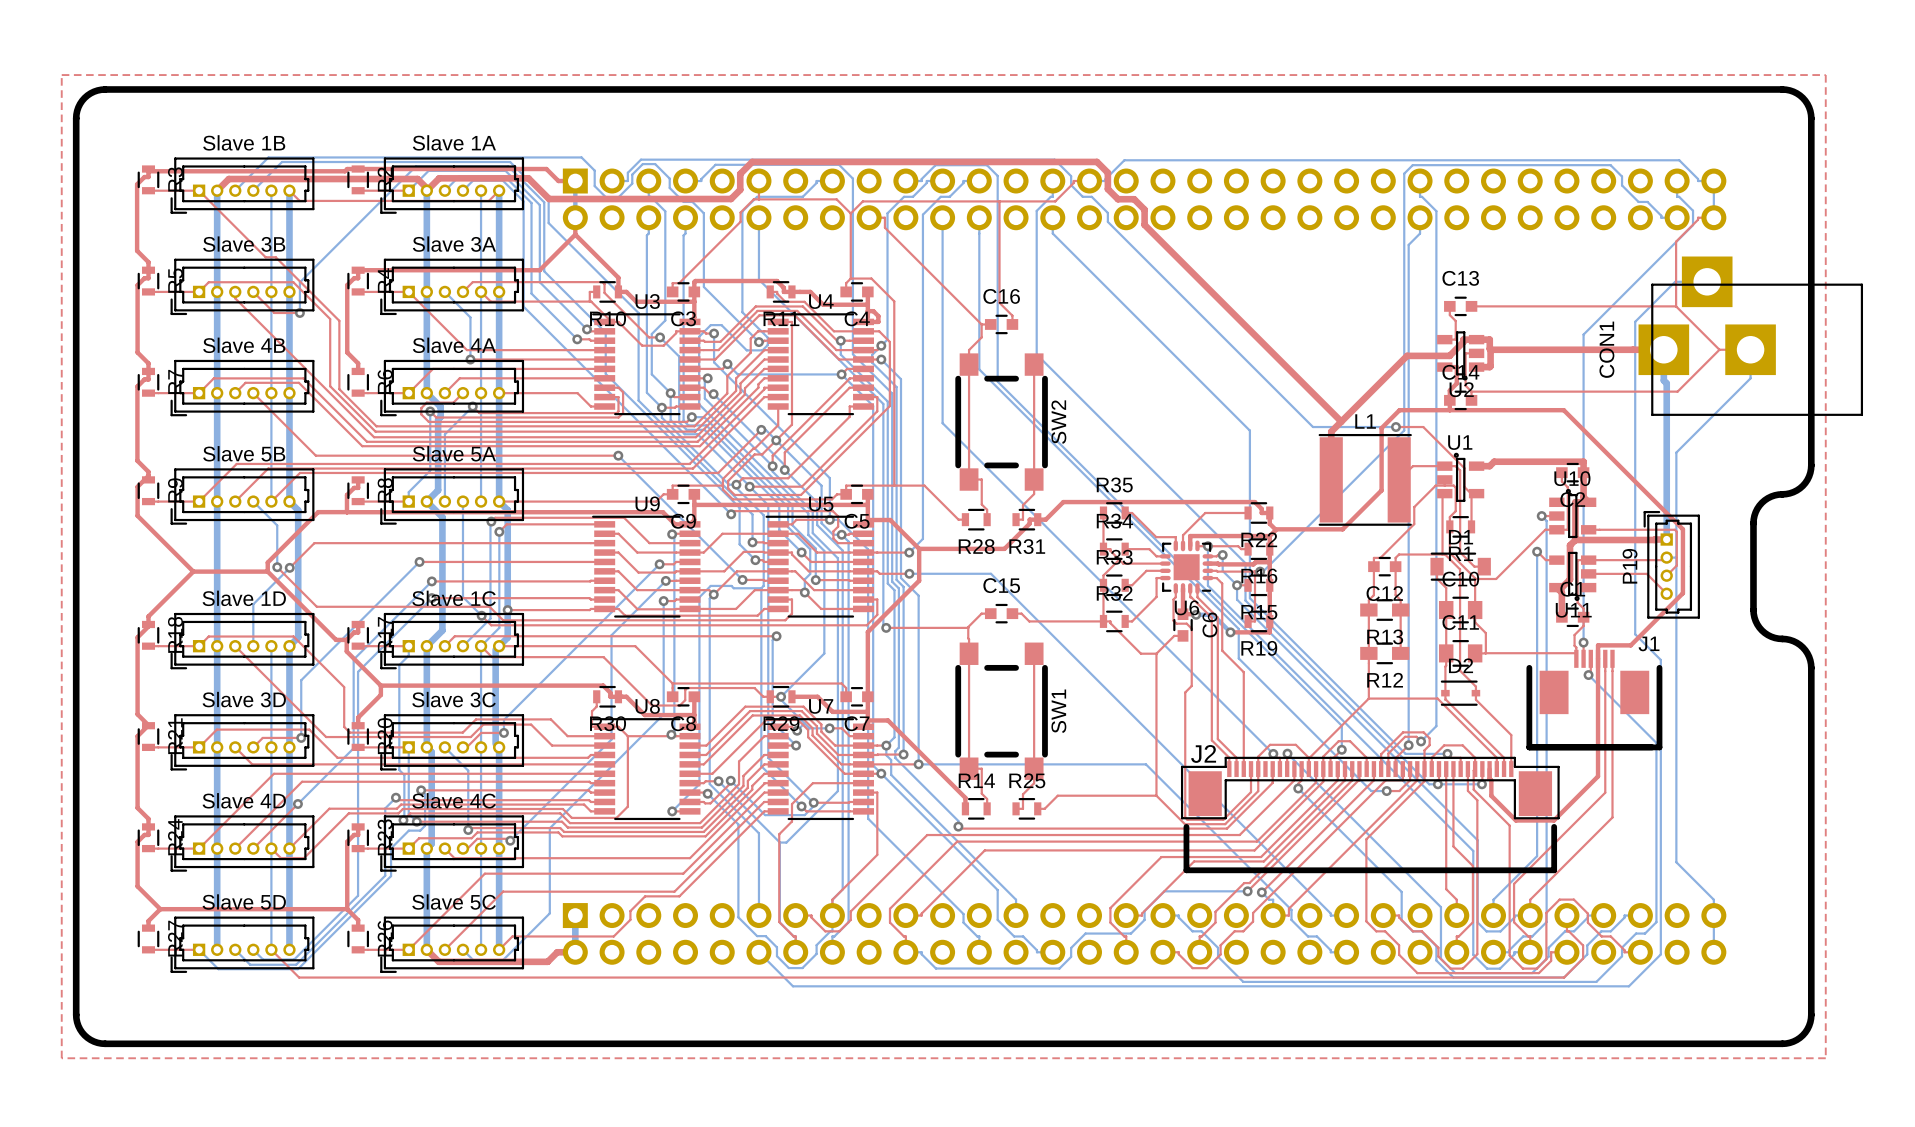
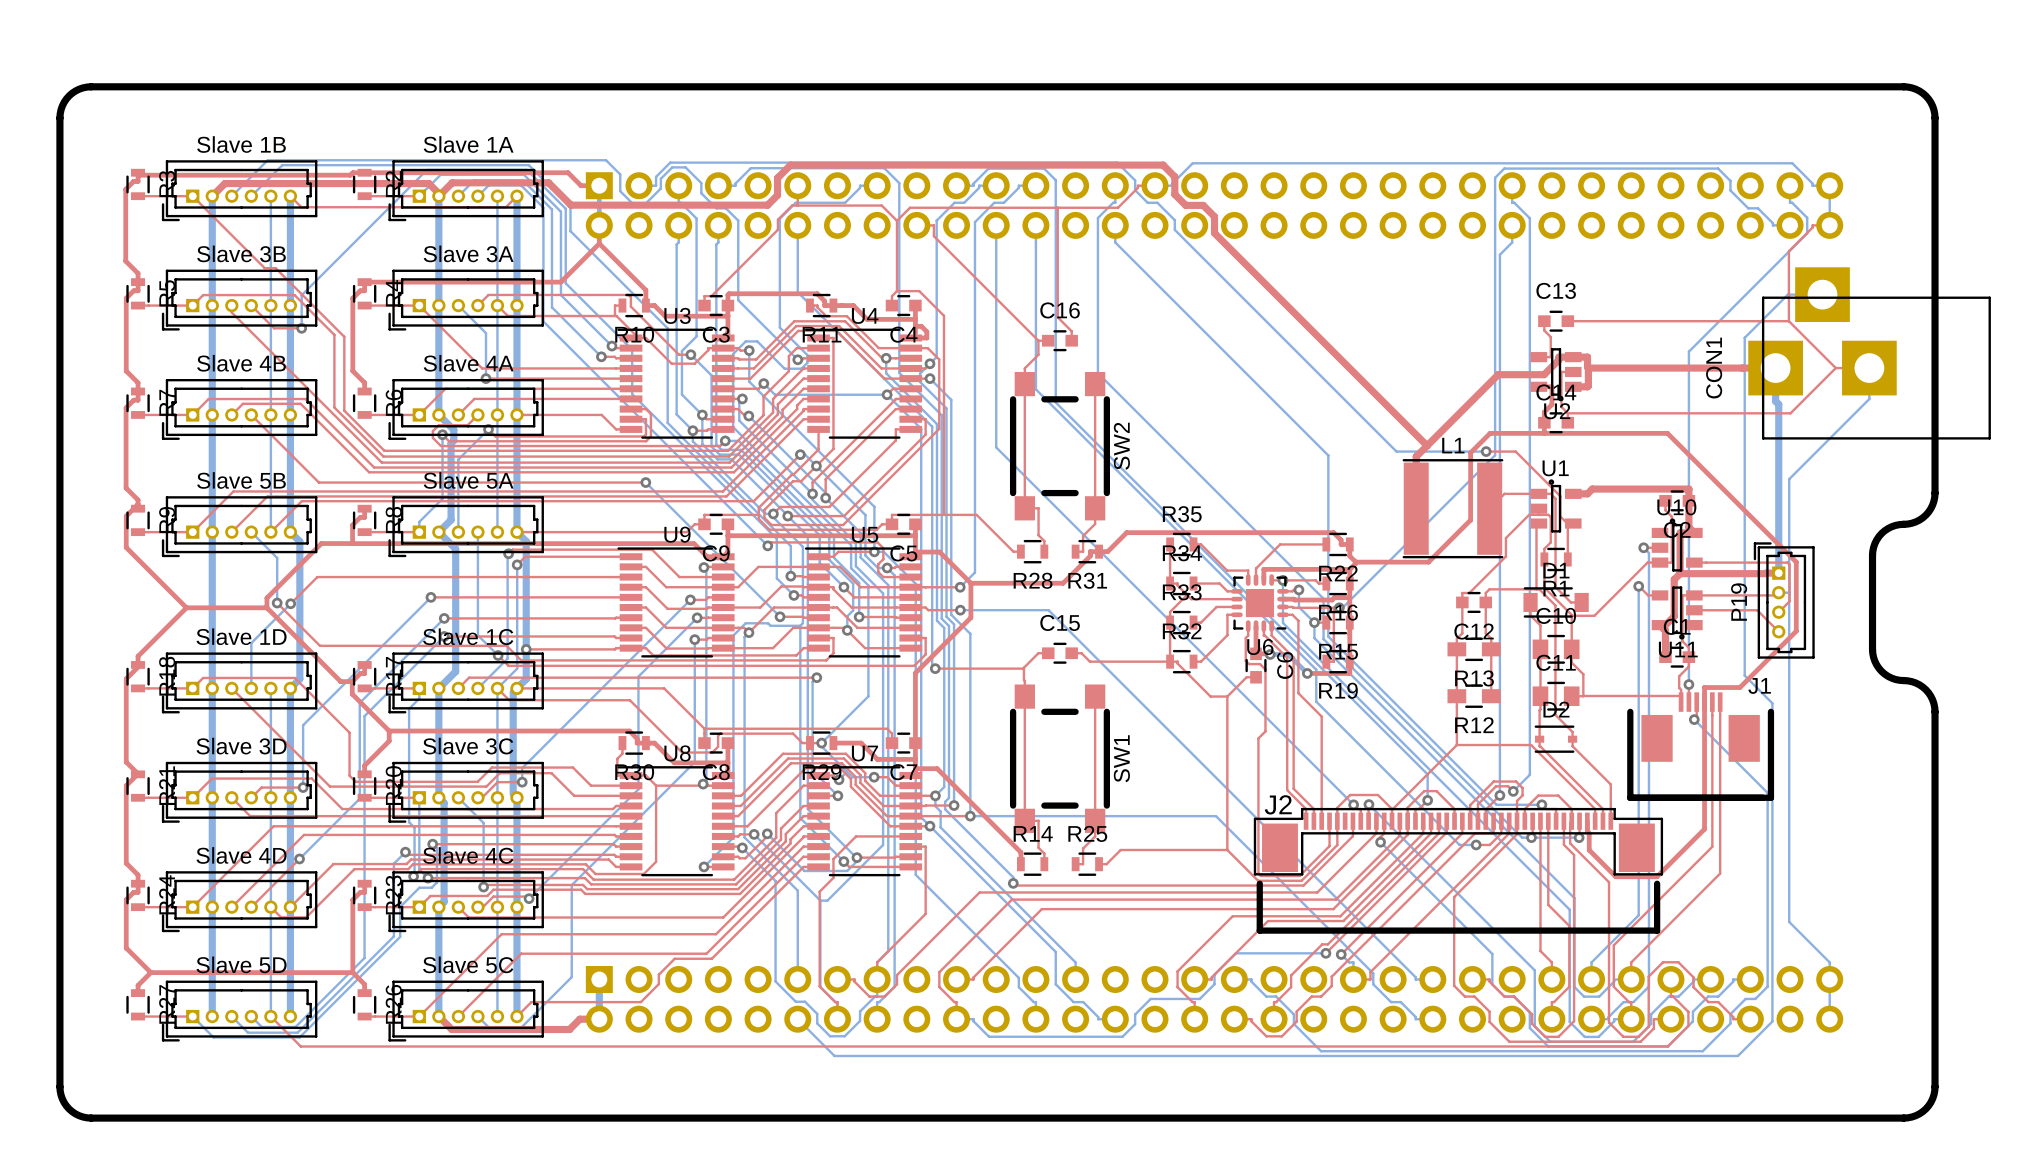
top zone outline: (61, 75) (1825, 75) (1825, 1058) (61, 1058) (61, 75) -> none

